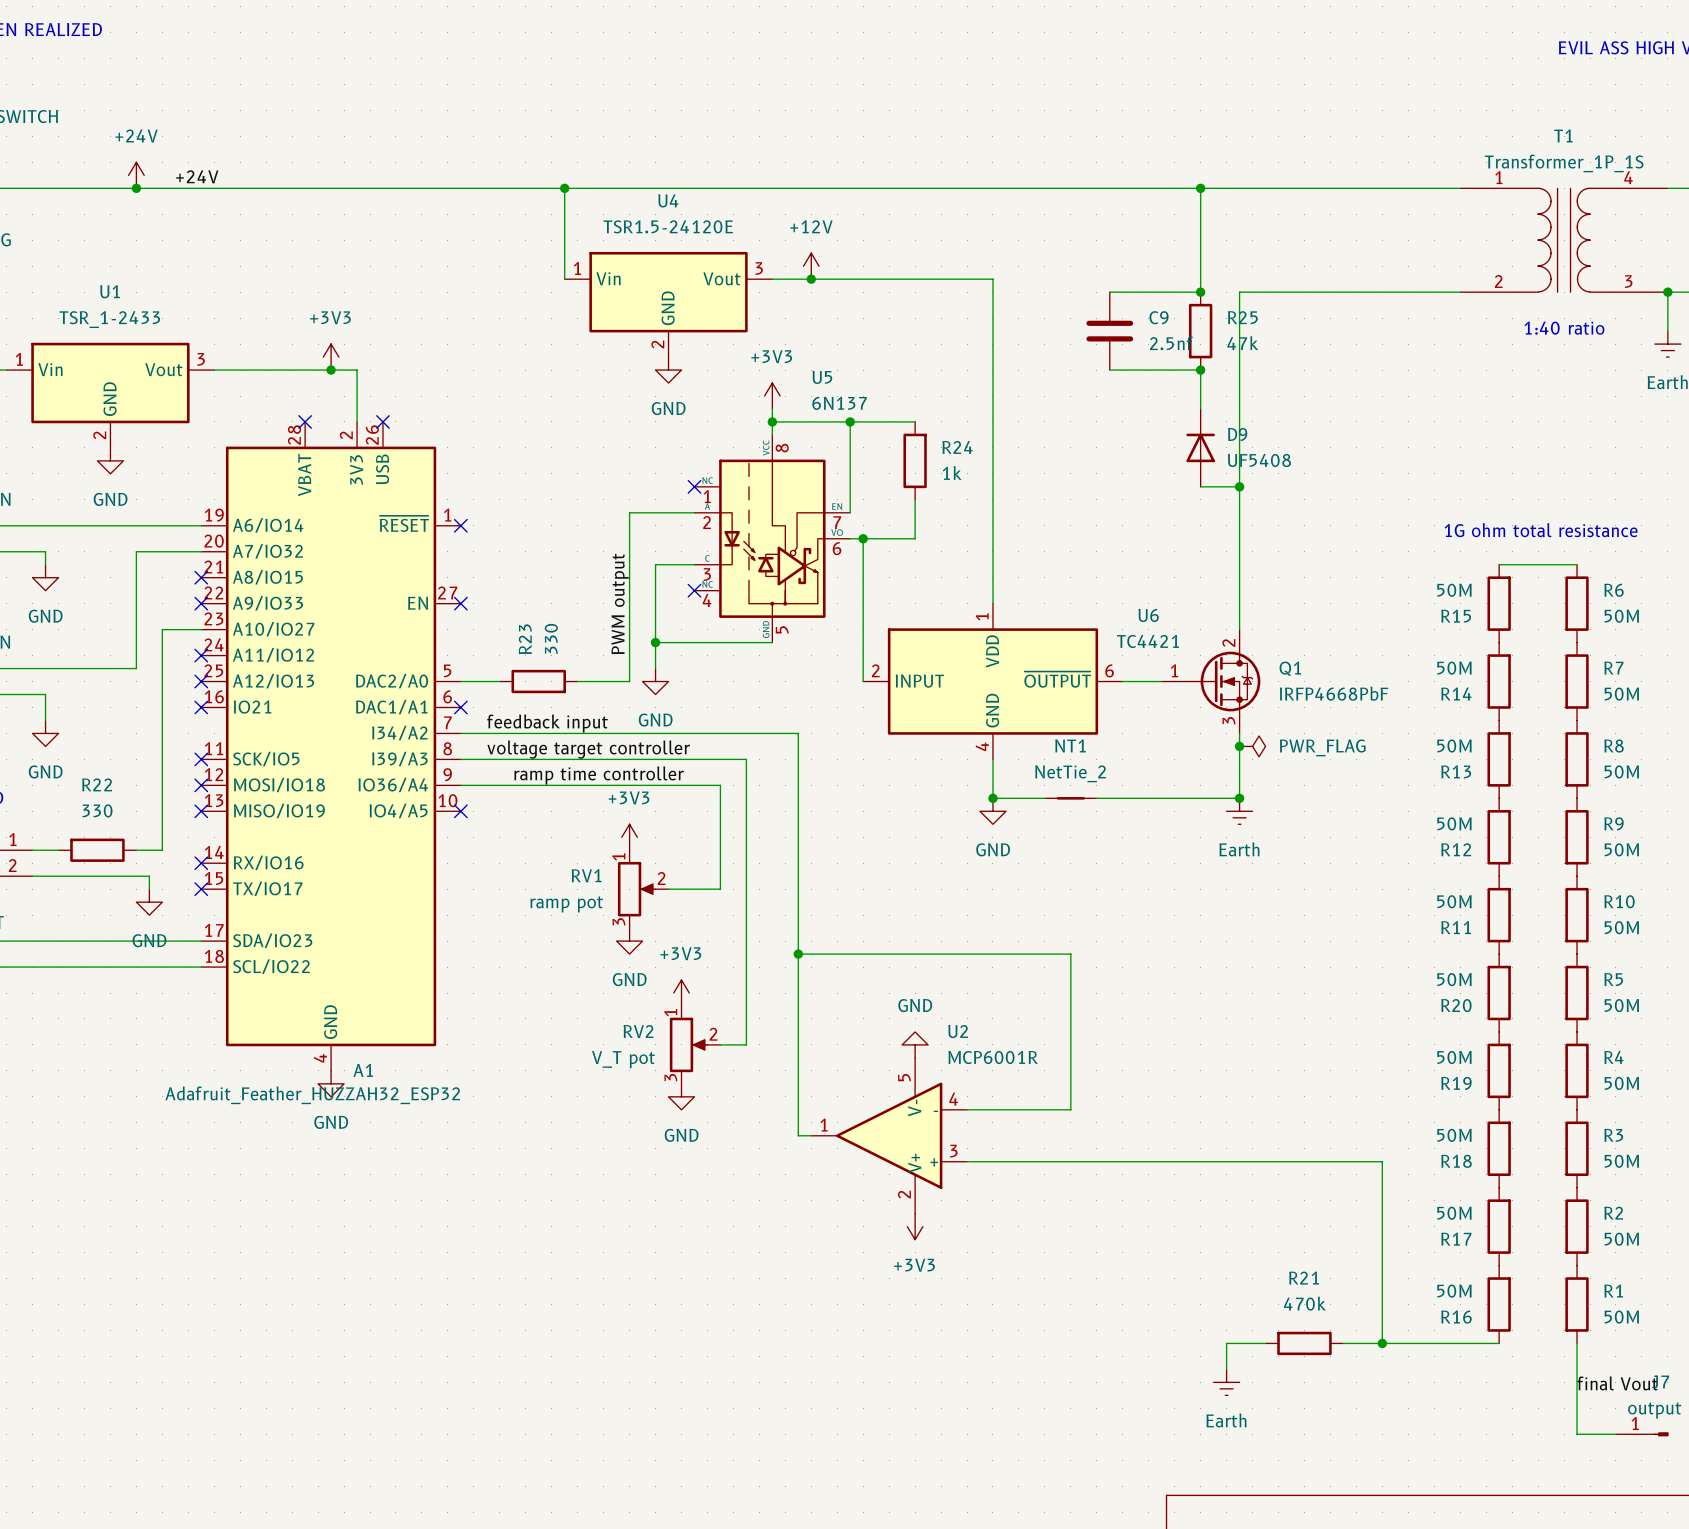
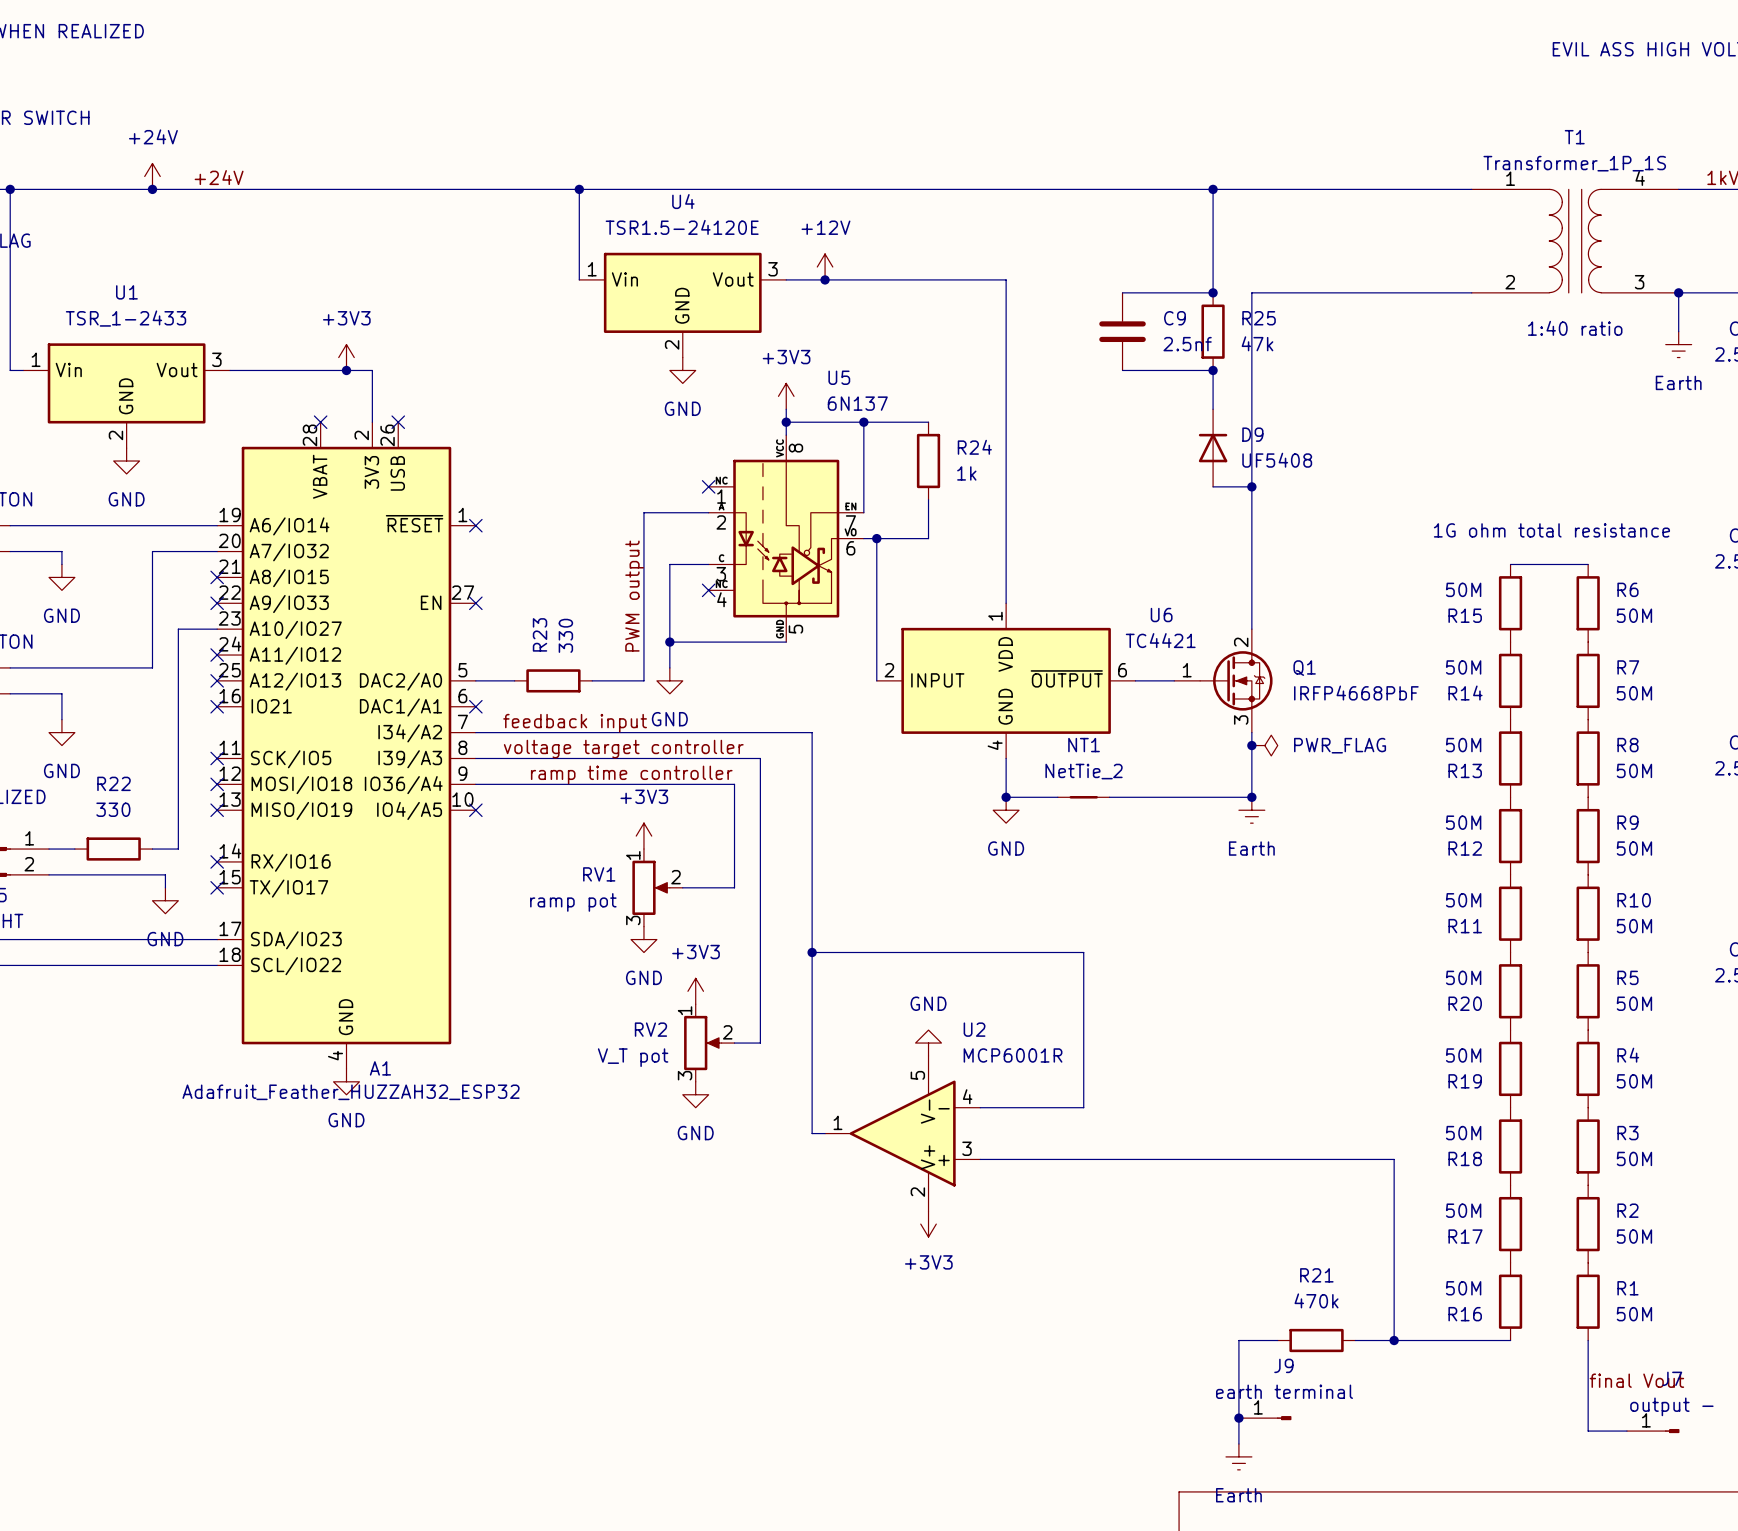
wire: none -> (1238, 1366) (1238, 1443)
power symbol position: Earth (1226, 1382) -> Earth (1238, 1456)
junction: none -> (1238, 1418)
J9: none -> earth terminal (1265, 1418)

